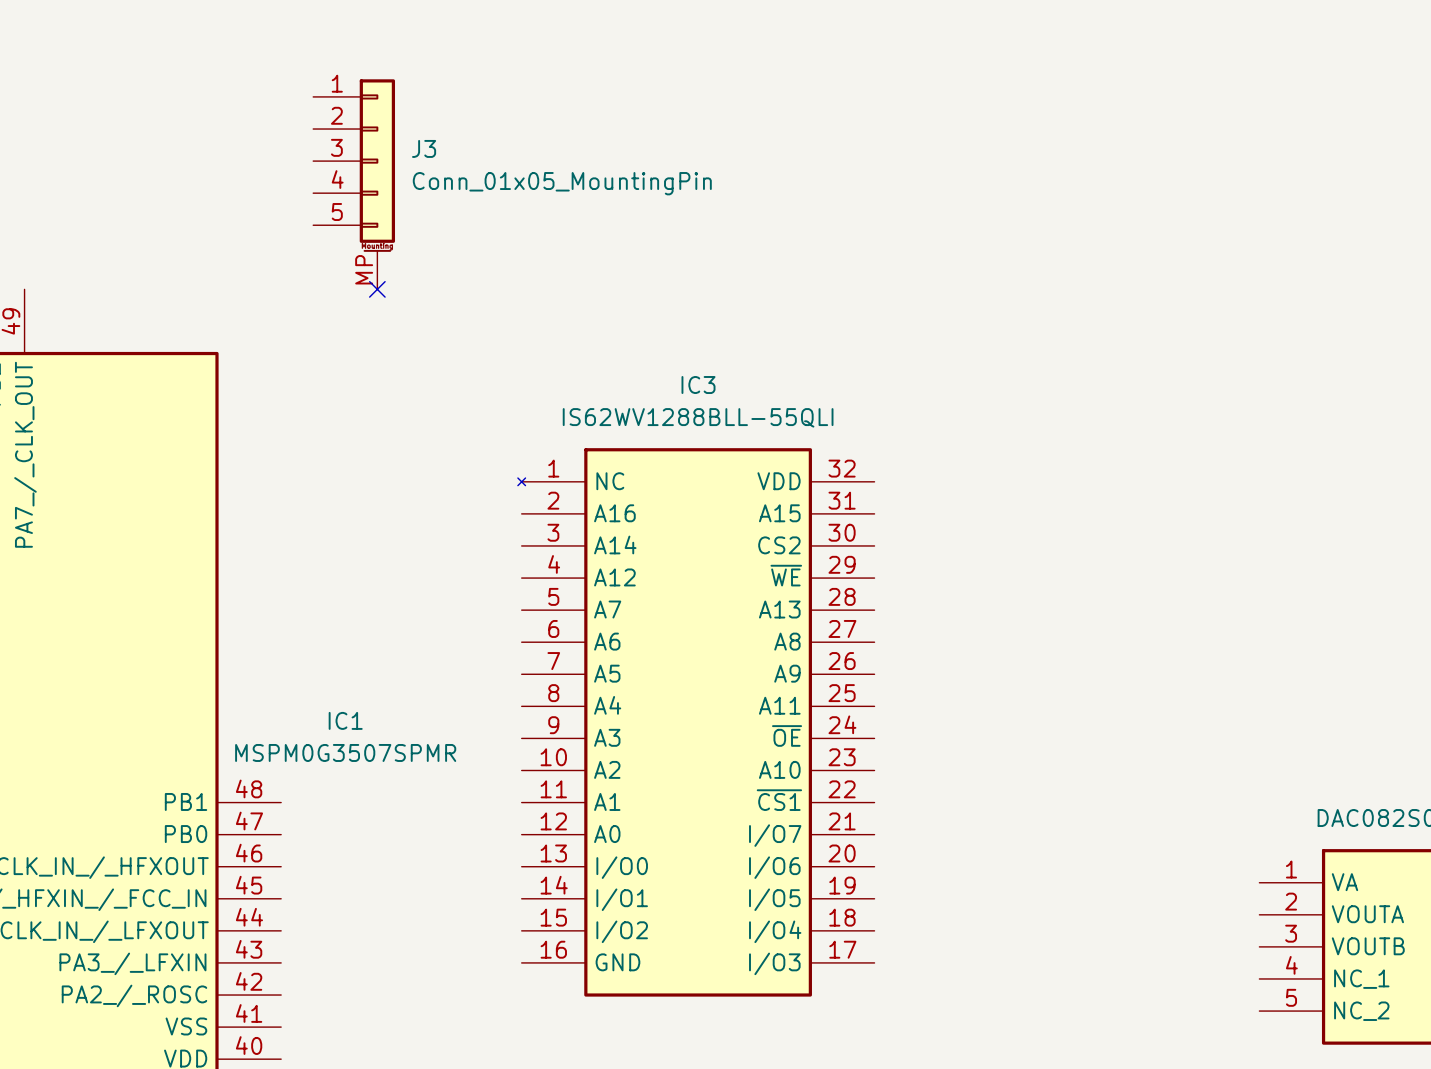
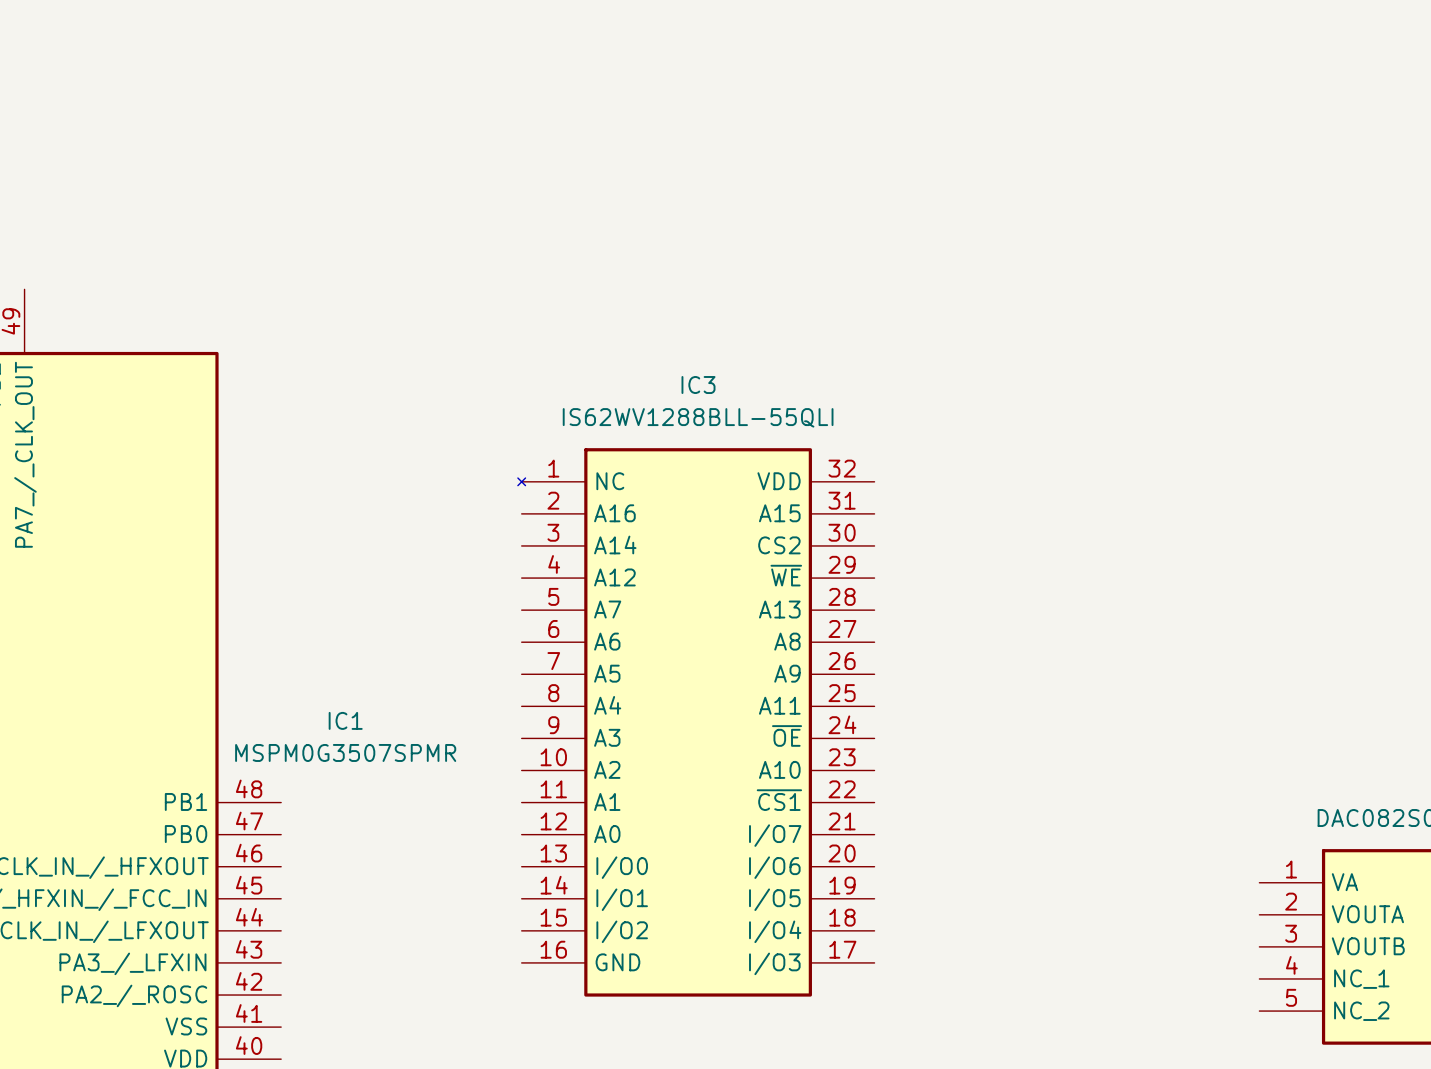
J3: Conn_01x05_MountingPin (354, 184) -> none
no-connect mark: (377, 289) -> none

